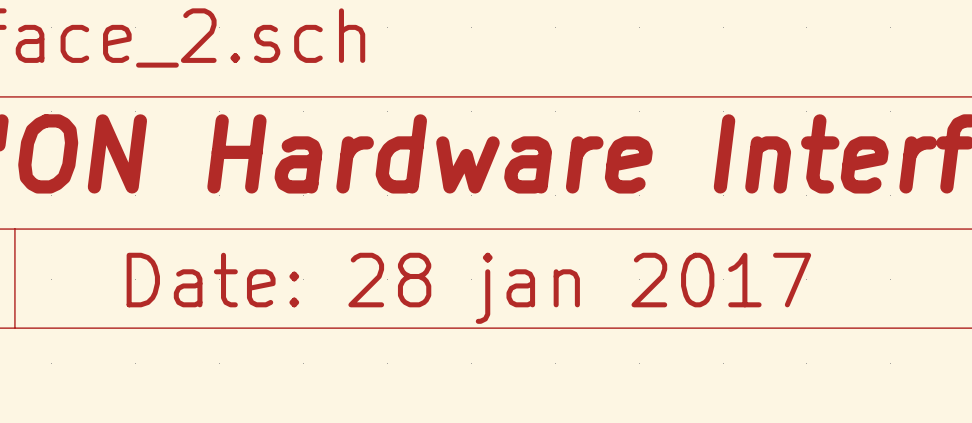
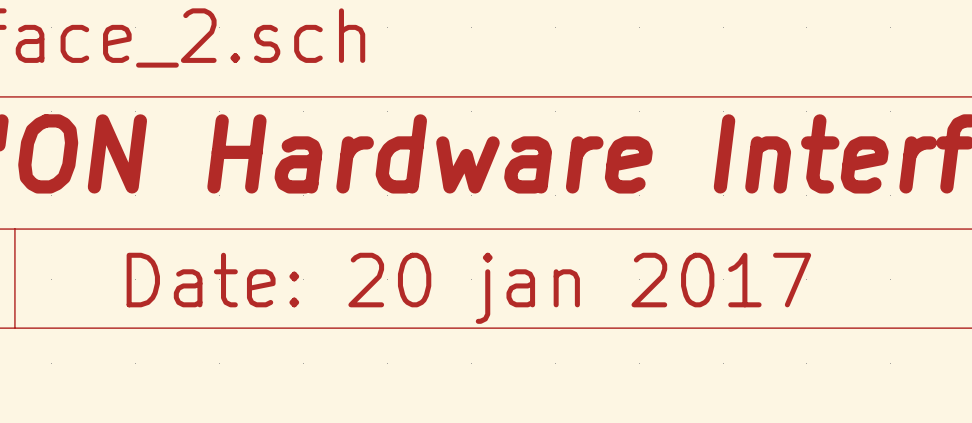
title block: Date: 28 jan 2017 (468, 288) -> Date: 20 jan 2017 (468, 288)

